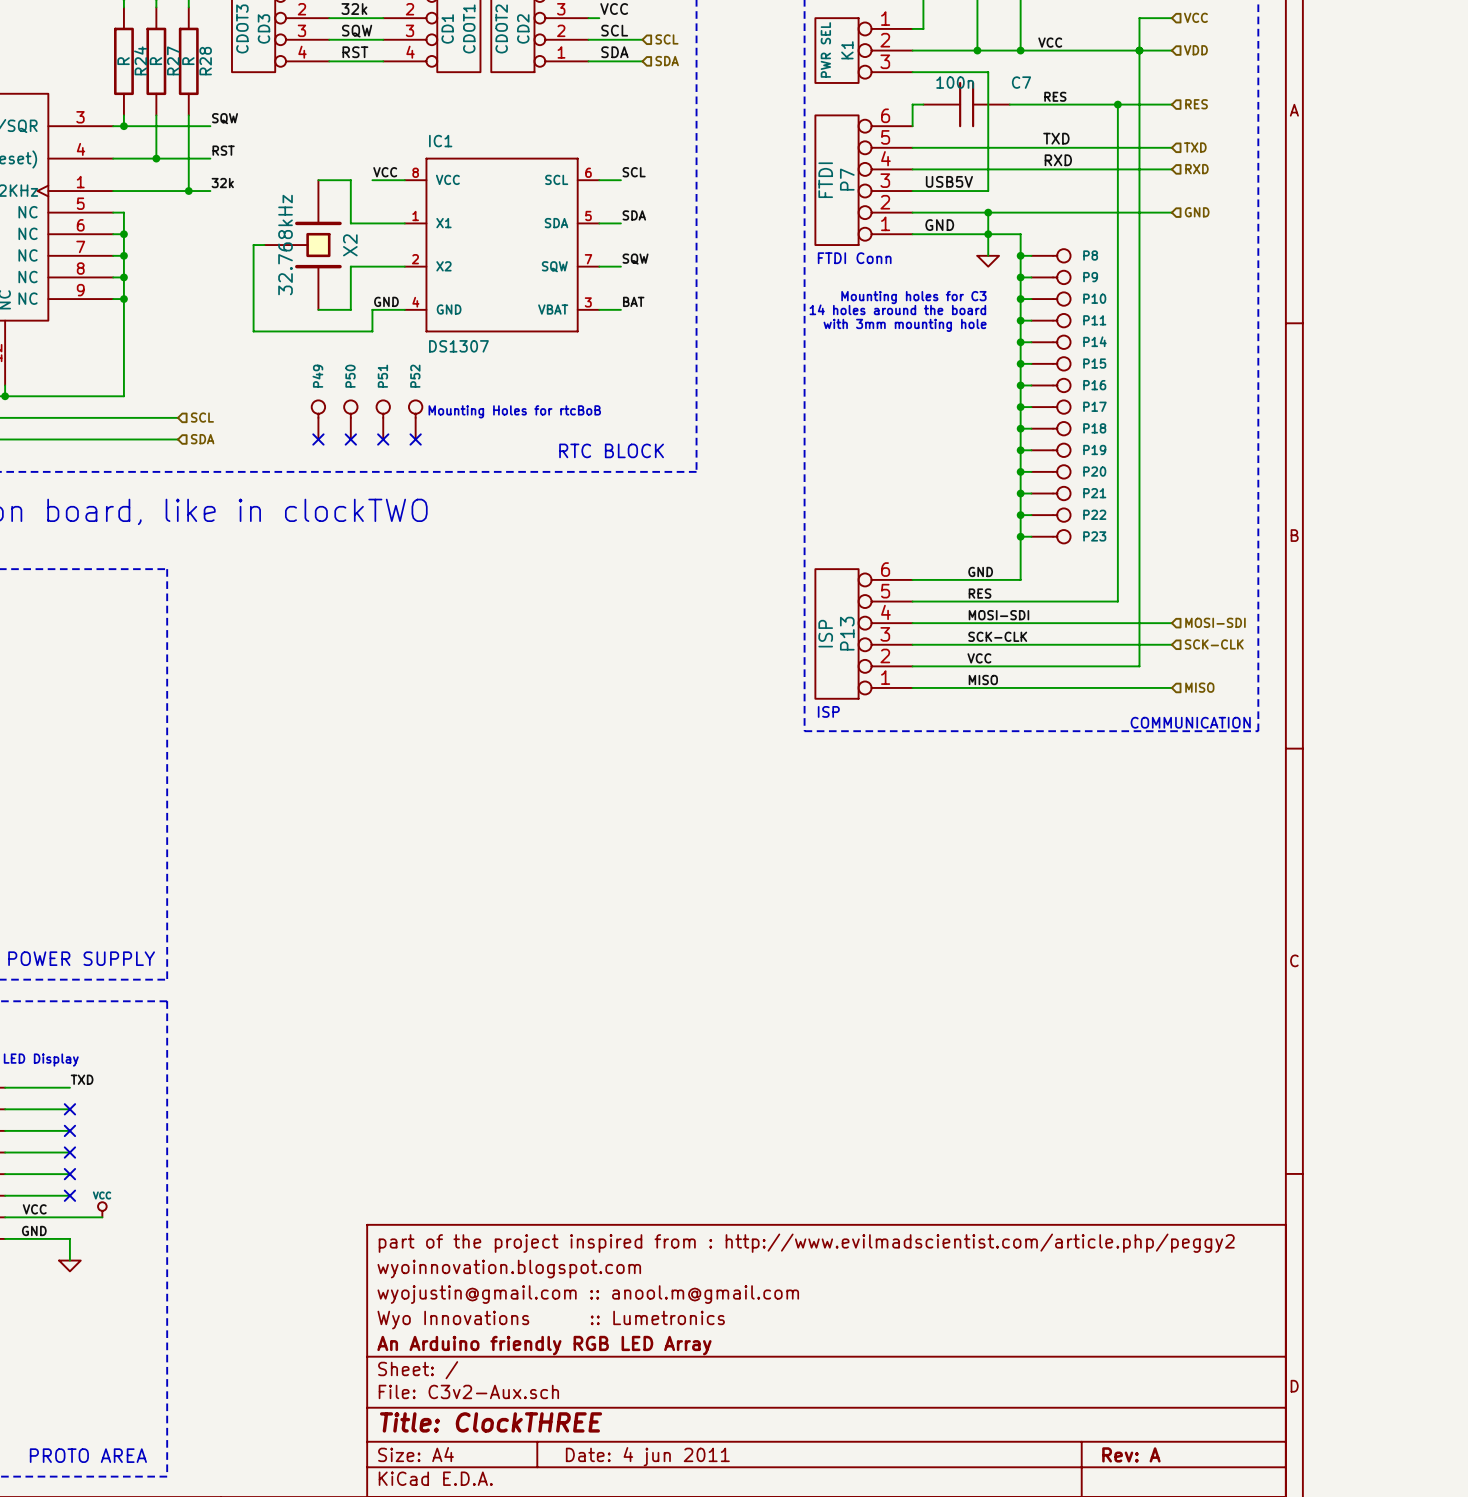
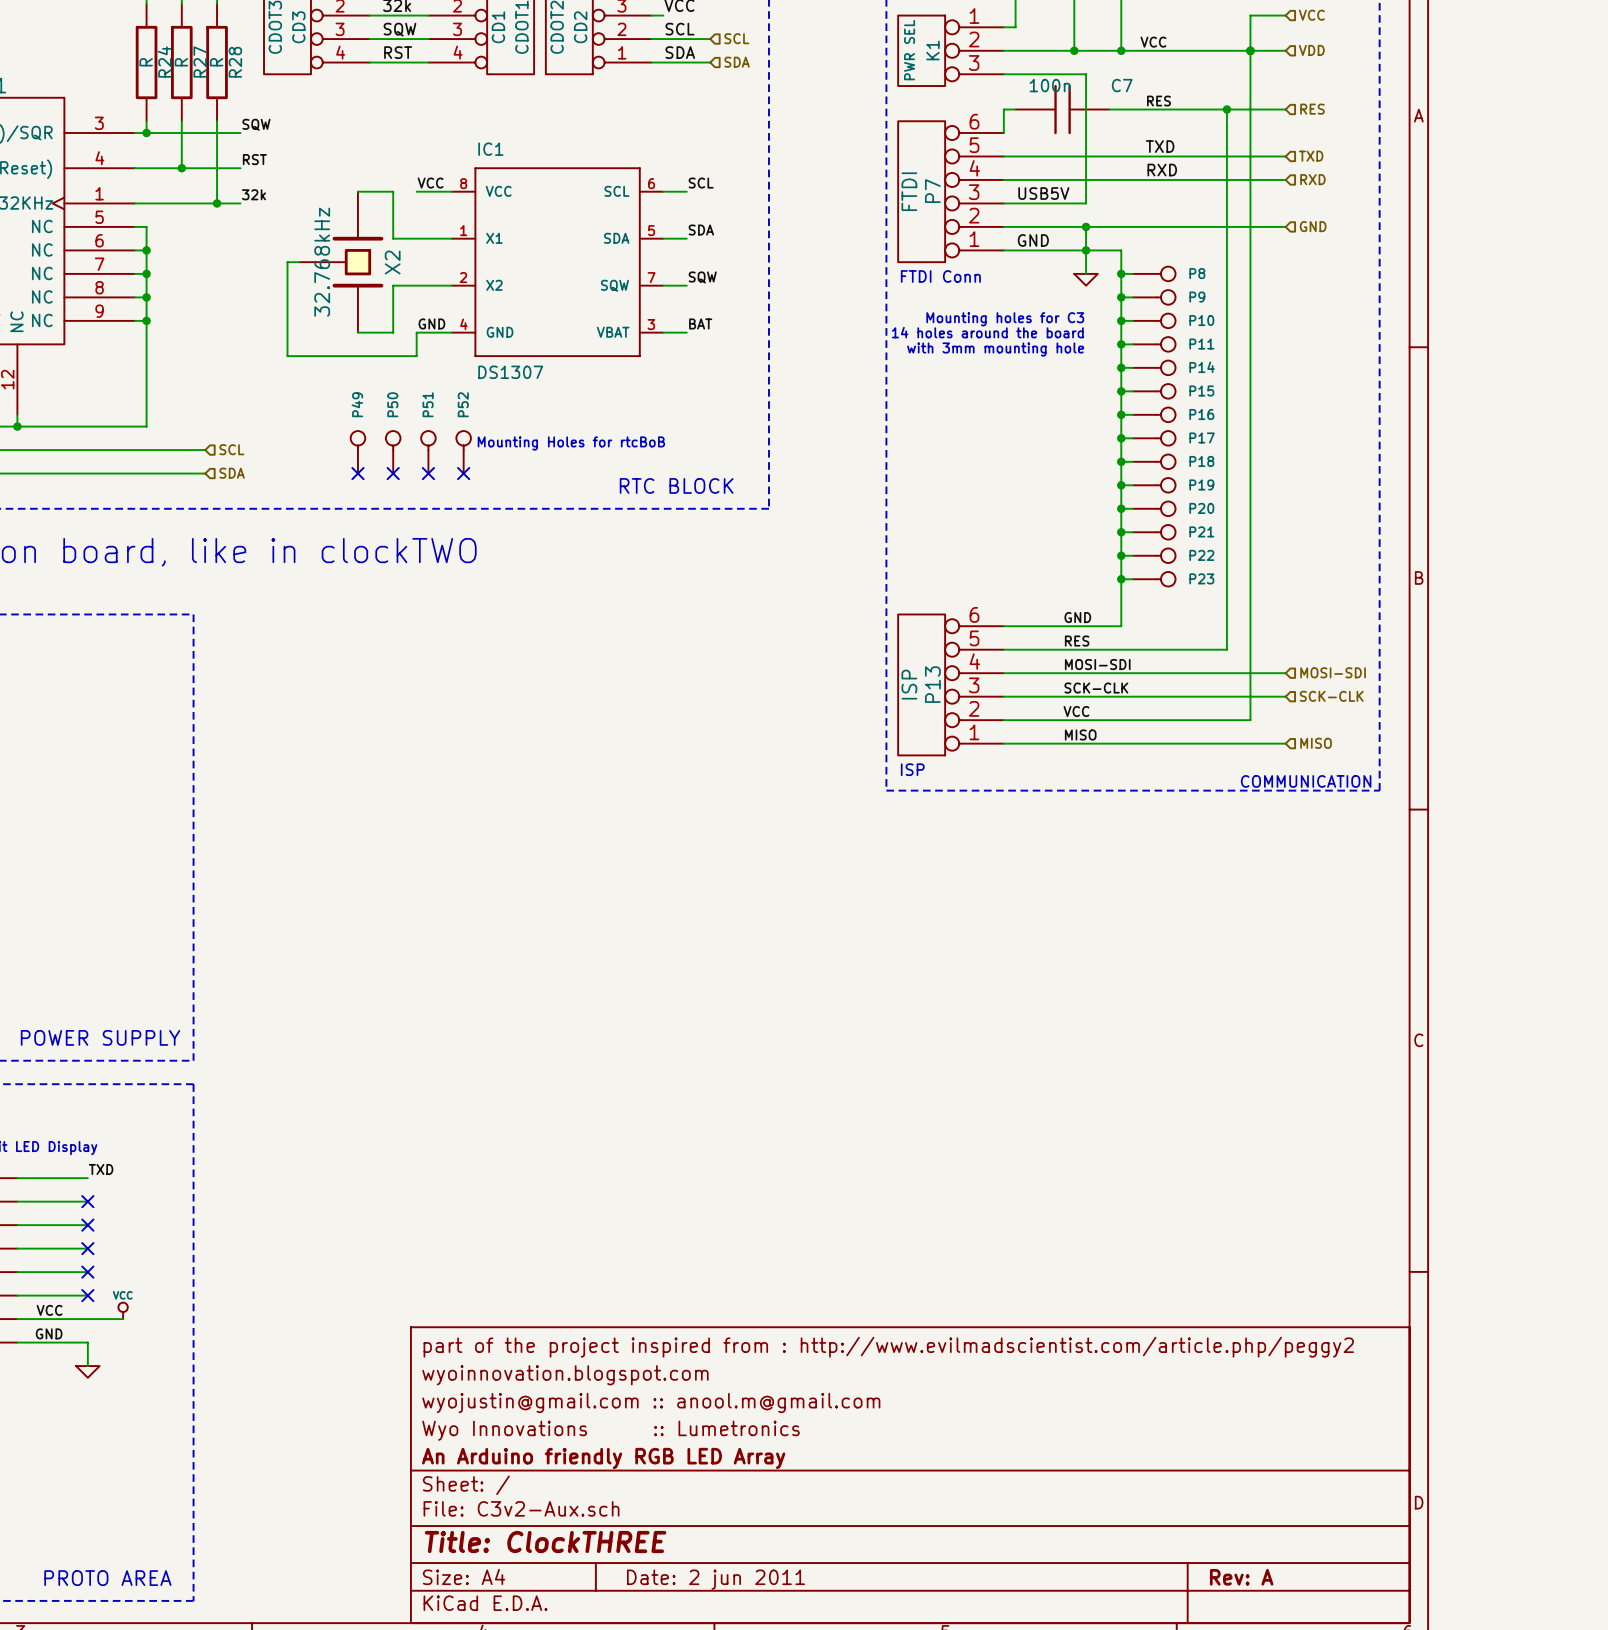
title block: Date: 4 jun 2011 (647, 1456) -> Date: 2 jun 2011 (716, 1579)

